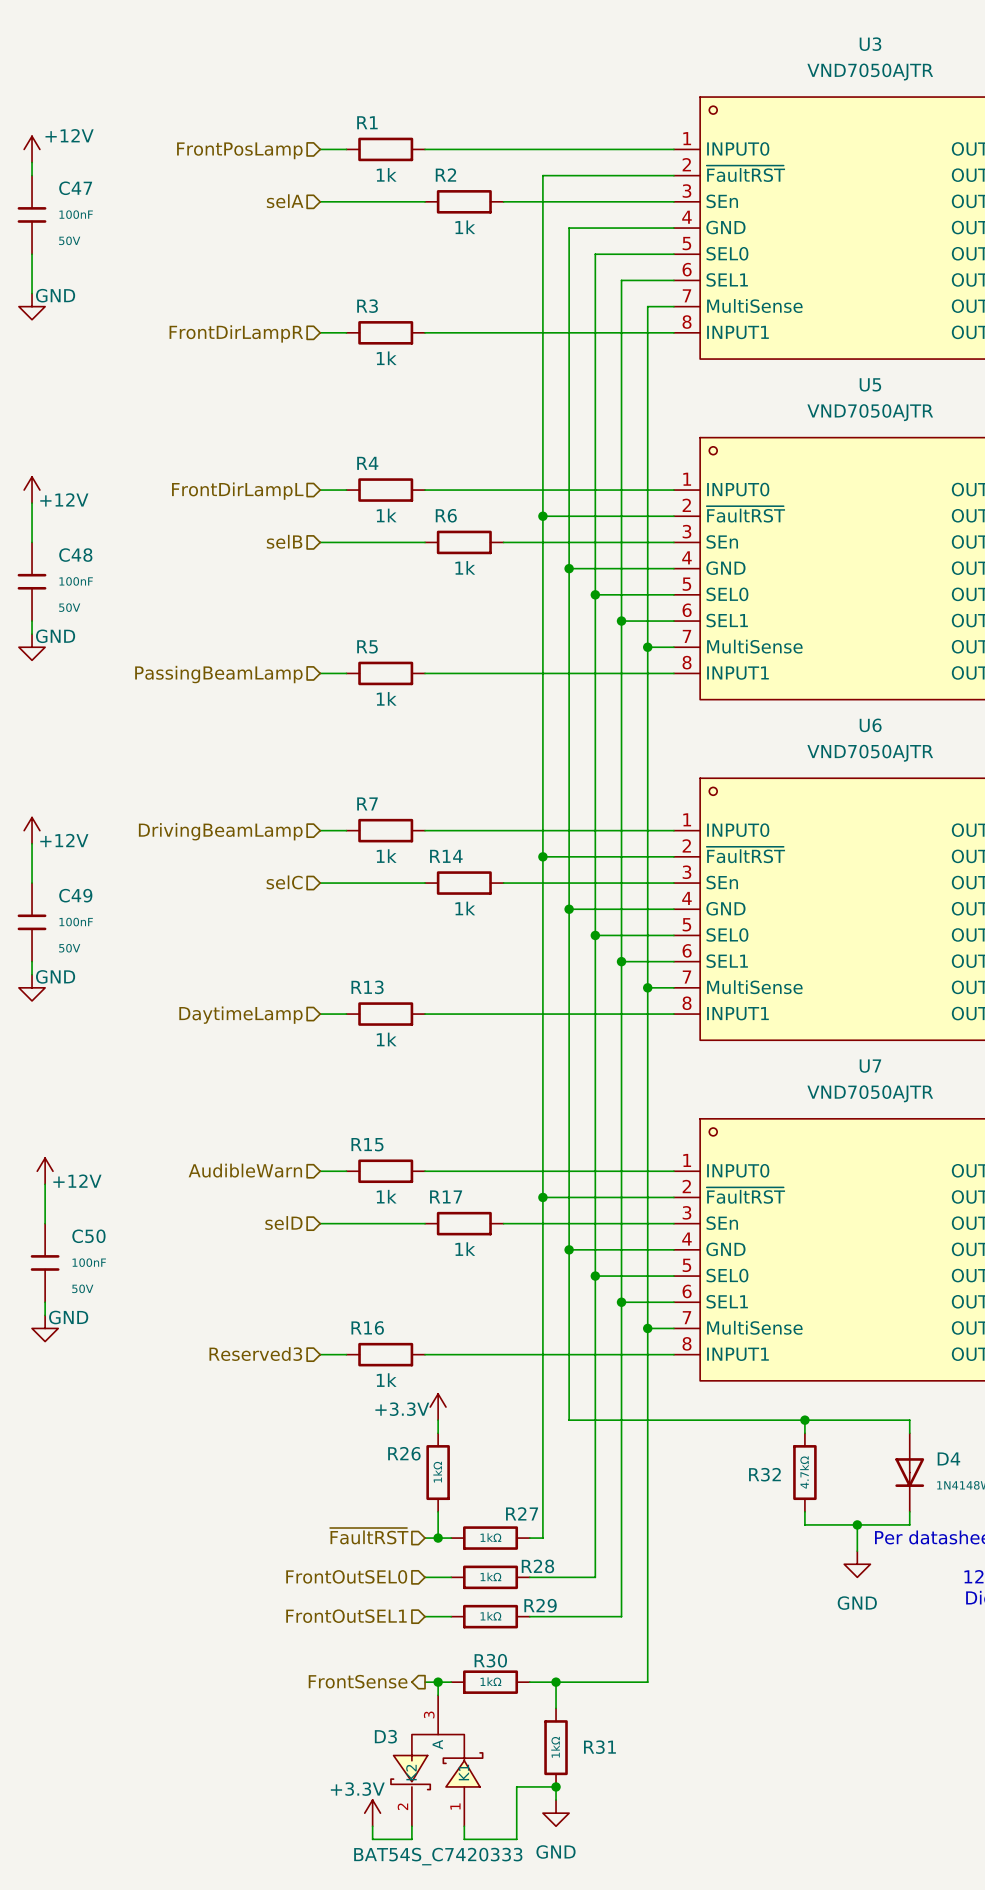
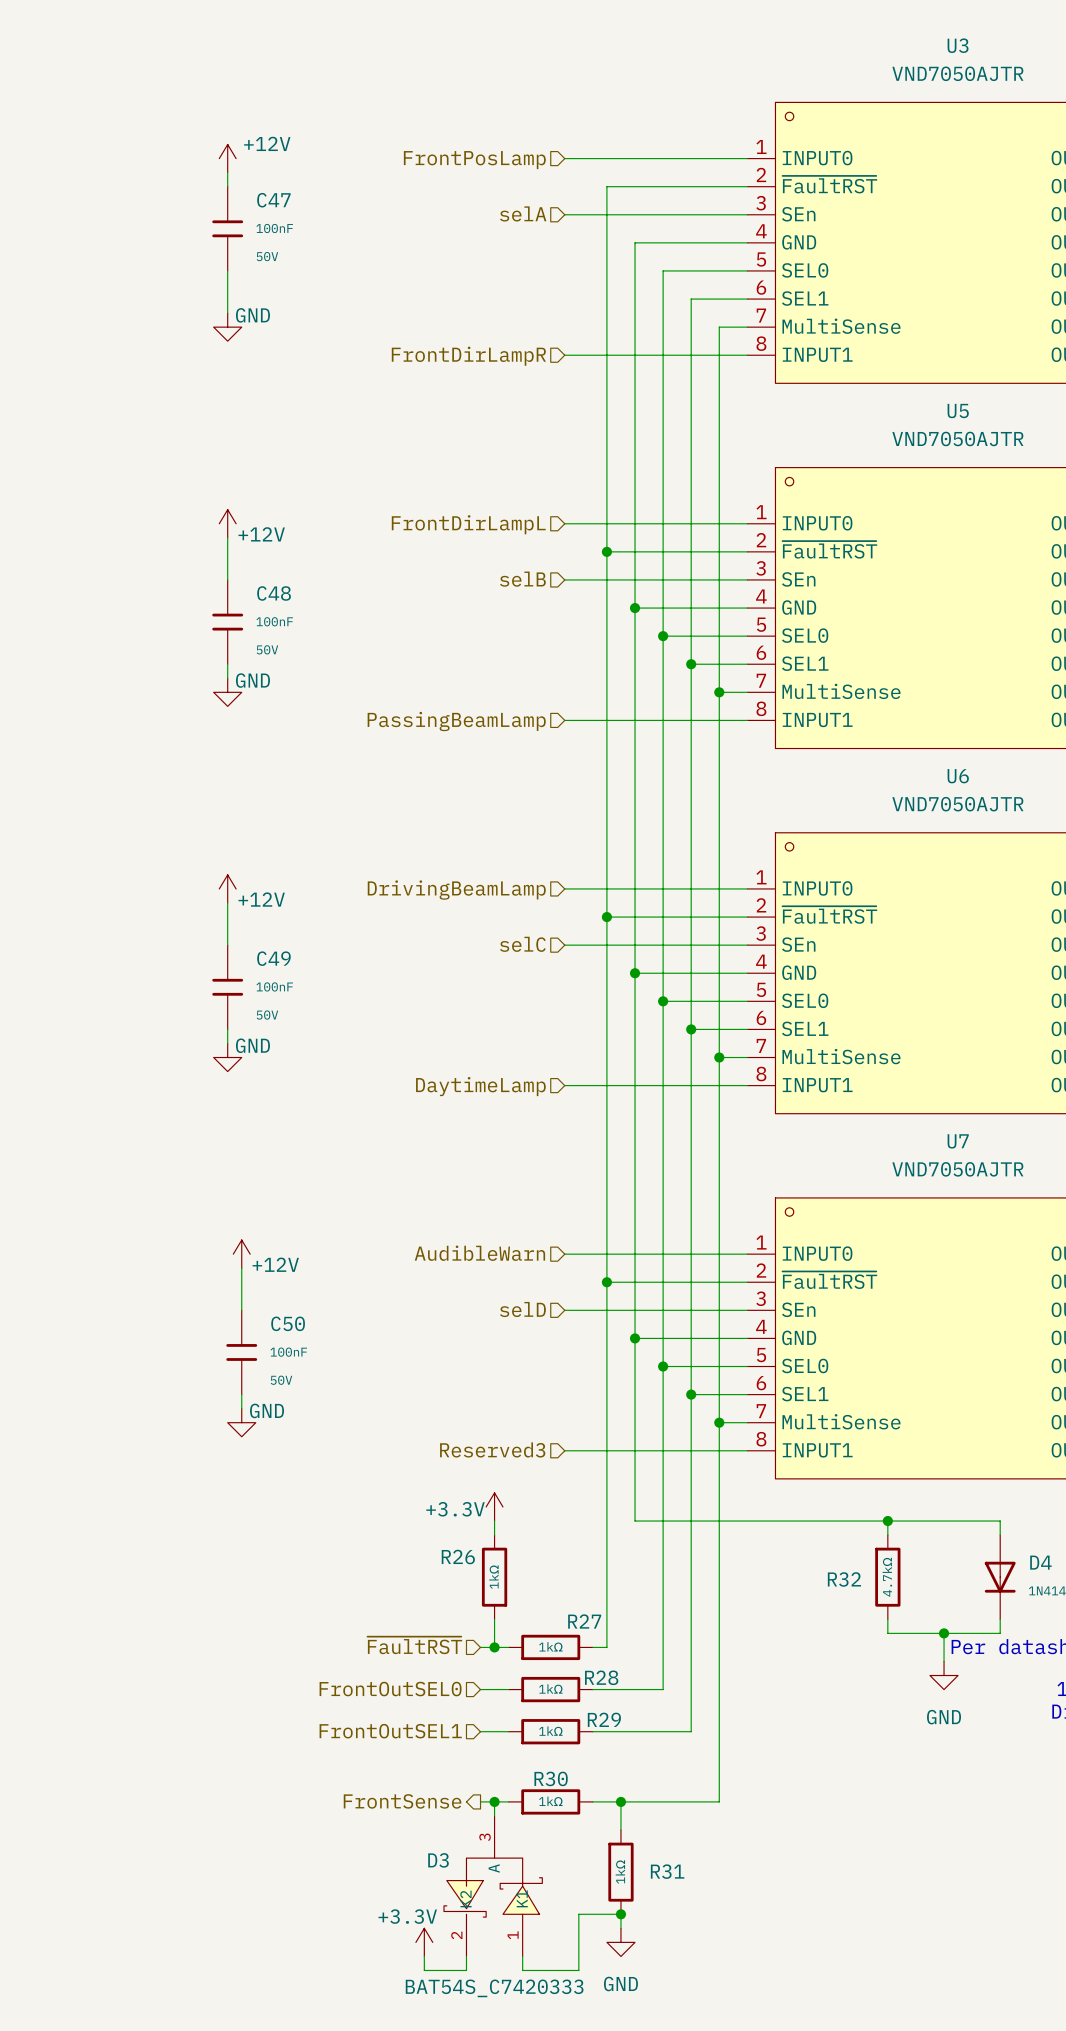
power symbol position: +12V (32, 149) -> +12V (227, 158)
wire: (320, 149) (346, 149) -> none
R1: 1k (385, 149) -> none
wire: (425, 149) (503, 149) -> none
hierarchical label position: FrontPosLamp (239, 150) -> FrontPosLamp (474, 160)
wire: (32, 162) (32, 175) -> (227, 172) (227, 186)
hierarchical label position: selA (285, 201) -> selA (523, 213)
wire: (320, 201) (425, 201) -> none
R2: 1k (464, 201) -> none
C47 position: (32, 214) -> (227, 228)
wire: (32, 254) (32, 293) -> (227, 270) (227, 313)
power symbol position: GND (32, 306) -> GND (227, 327)
wire: (320, 332) (346, 332) -> none
R3: 1k (385, 332) -> none
wire: (425, 332) (503, 332) -> none
hierarchical label position: FrontDirLampR (236, 333) -> FrontDirLampR (468, 356)
power symbol position: +12V (32, 490) -> +12V (227, 523)
wire: (320, 490) (346, 490) -> none
R4: 1k (385, 490) -> none
wire: (425, 490) (503, 490) -> none
hierarchical label position: FrontDirLampL (237, 491) -> FrontDirLampL (468, 524)
wire: (32, 503) (32, 542) -> (227, 537) (227, 579)
hierarchical label position: selB (284, 541) -> selB (522, 579)
wire: (320, 542) (425, 542) -> none
R6: 1k (464, 542) -> none
C48 position: (32, 581) -> (227, 622)
wire: (32, 621) (32, 634) -> (227, 664) (227, 678)
power symbol position: GND (32, 647) -> GND (227, 692)
wire: (320, 673) (346, 673) -> none
R5: 1k (385, 673) -> none
wire: (425, 673) (503, 673) -> none
hierarchical label position: PassingBeamLamp (218, 674) -> PassingBeamLamp (456, 721)
power symbol position: +12V (32, 830) -> +12V (227, 888)
wire: (320, 830) (346, 830) -> none
R7: 1k (385, 830) -> none
wire: (425, 830) (503, 830) -> none
hierarchical label position: DrivingBeamLamp (220, 831) -> DrivingBeamLamp (456, 890)
wire: (32, 843) (32, 883) -> (227, 903) (227, 945)
hierarchical label position: selC (284, 882) -> selC (522, 944)
wire: (320, 883) (425, 883) -> none
R14: 1k (464, 883) -> none
C49 position: (32, 922) -> (227, 987)
wire: (32, 961) (32, 974) -> (227, 1029) (227, 1043)
power symbol position: GND (32, 987) -> GND (227, 1057)
wire: (320, 1014) (346, 1014) -> none
R13: 1k (385, 1014) -> none
wire: (425, 1014) (503, 1014) -> none
hierarchical label position: DaytimeLamp (240, 1015) -> DaytimeLamp (480, 1086)
hierarchical label position: AudibleWarn (245, 1170) -> AudibleWarn (479, 1253)
power symbol position: +12V (45, 1171) -> +12V (241, 1254)
wire: (320, 1171) (346, 1171) -> none
R15: 1k (385, 1171) -> none
wire: (425, 1171) (503, 1171) -> none
wire: (45, 1184) (45, 1223) -> (241, 1268) (241, 1310)
hierarchical label position: selD (283, 1223) -> selD (522, 1309)
wire: (320, 1223) (425, 1223) -> none
R17: 1k (464, 1223) -> none
C50 position: (45, 1262) -> (241, 1352)
wire: (45, 1302) (45, 1315) -> (241, 1394) (241, 1408)
power symbol position: GND (45, 1328) -> GND (241, 1422)
hierarchical label position: Reserved3 (255, 1354) -> Reserved3 (492, 1449)
wire: (320, 1354) (346, 1354) -> none
R16: 1k (385, 1354) -> none
wire: (425, 1354) (503, 1354) -> none

